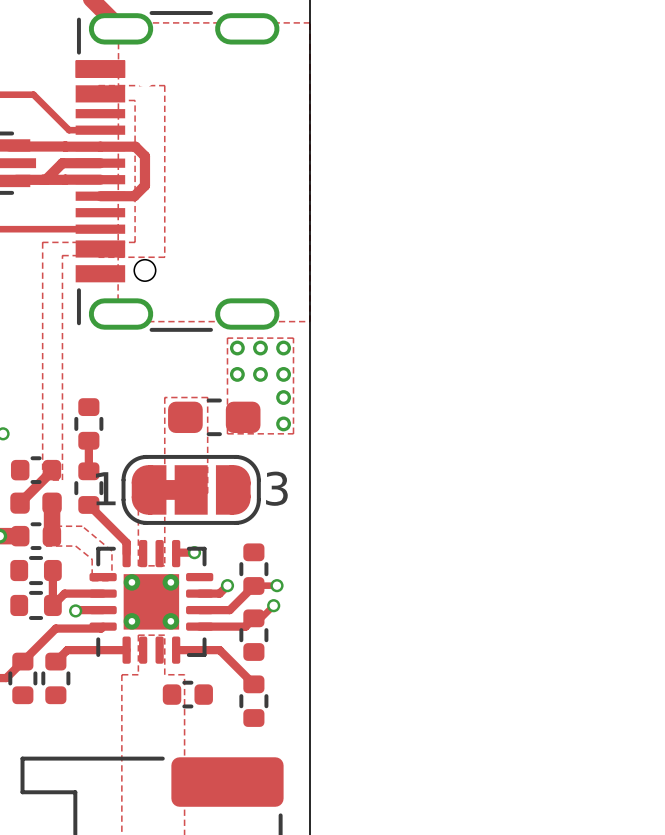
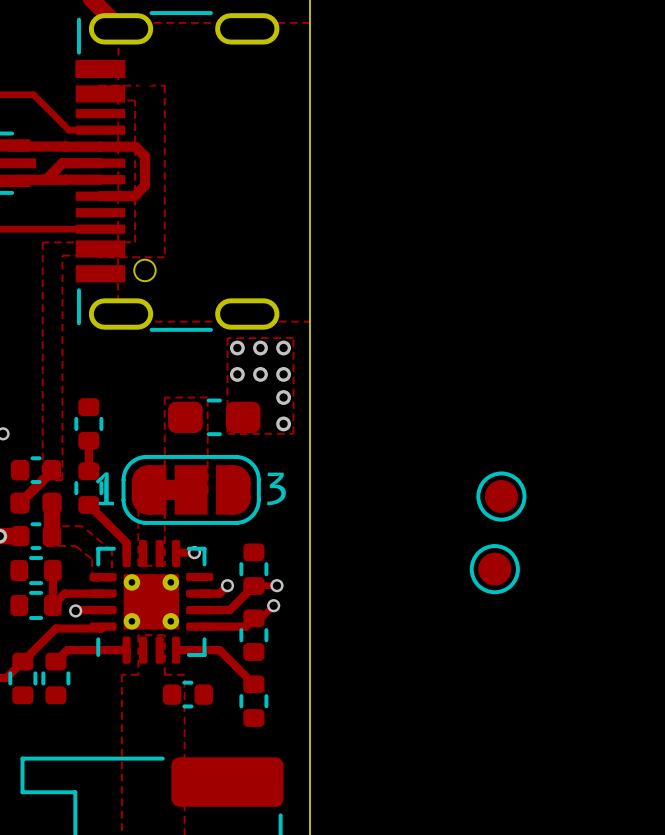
part: none -> (501, 496)
part: none -> (494, 569)

